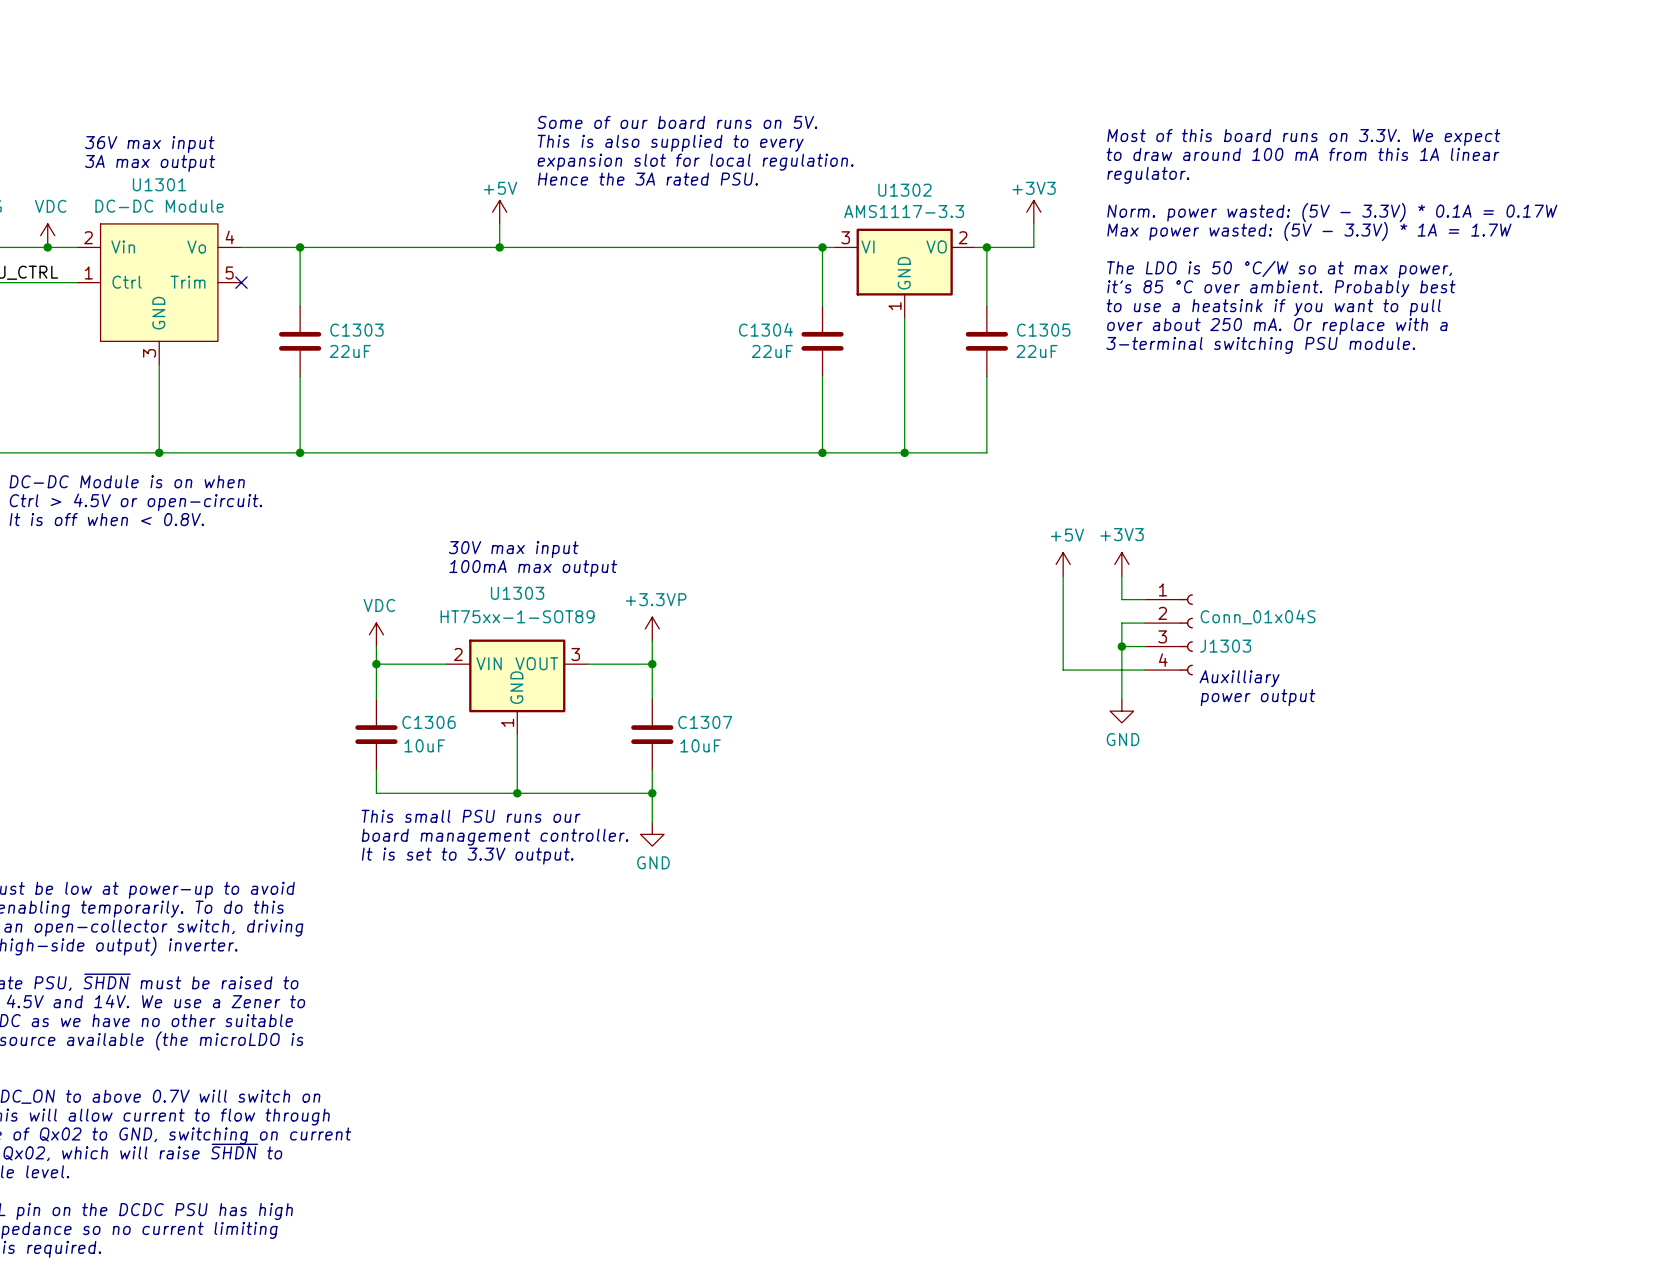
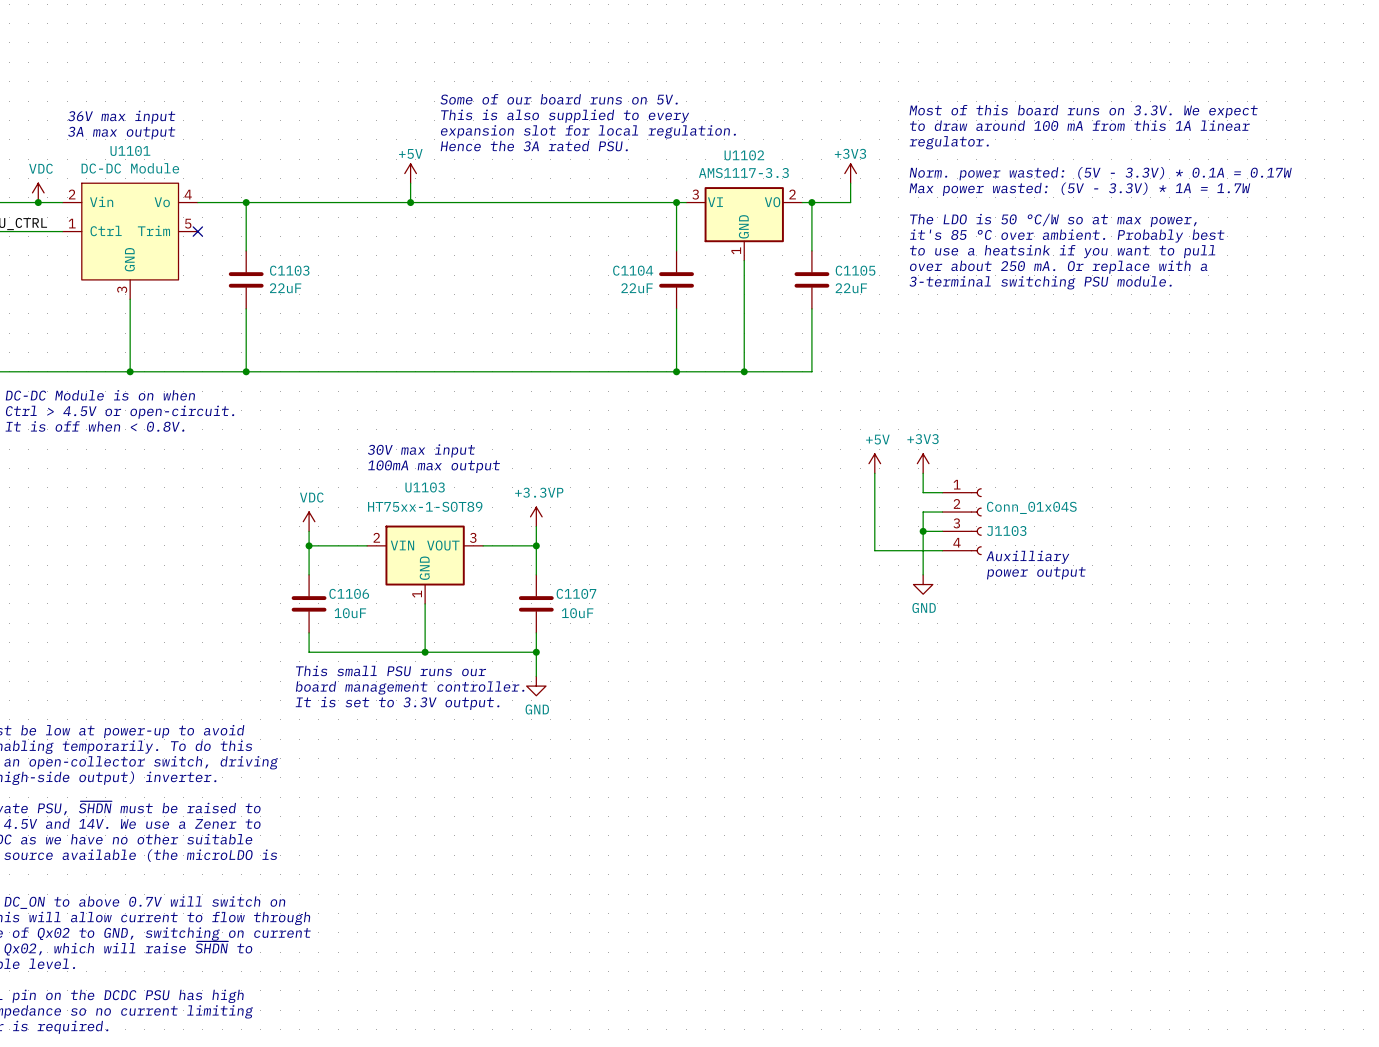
U1301 name: U1301 (159, 184) -> U1101 (130, 150)
U1302 name: U1302 (904, 190) -> U1102 (744, 155)
C1304 name: C1304 (765, 329) -> C1104 (633, 270)
C1303 name: C1303 (356, 330) -> C1103 (289, 270)
C1305 name: C1305 (1043, 330) -> C1105 (855, 270)
U1303 name: U1303 (517, 593) -> U1103 (425, 487)
J1303 name: J1303 (1225, 646) -> J1103 (1006, 530)
C1306 name: C1306 (429, 722) -> C1106 (349, 593)
C1307 name: C1307 (705, 722) -> C1107 (576, 593)

